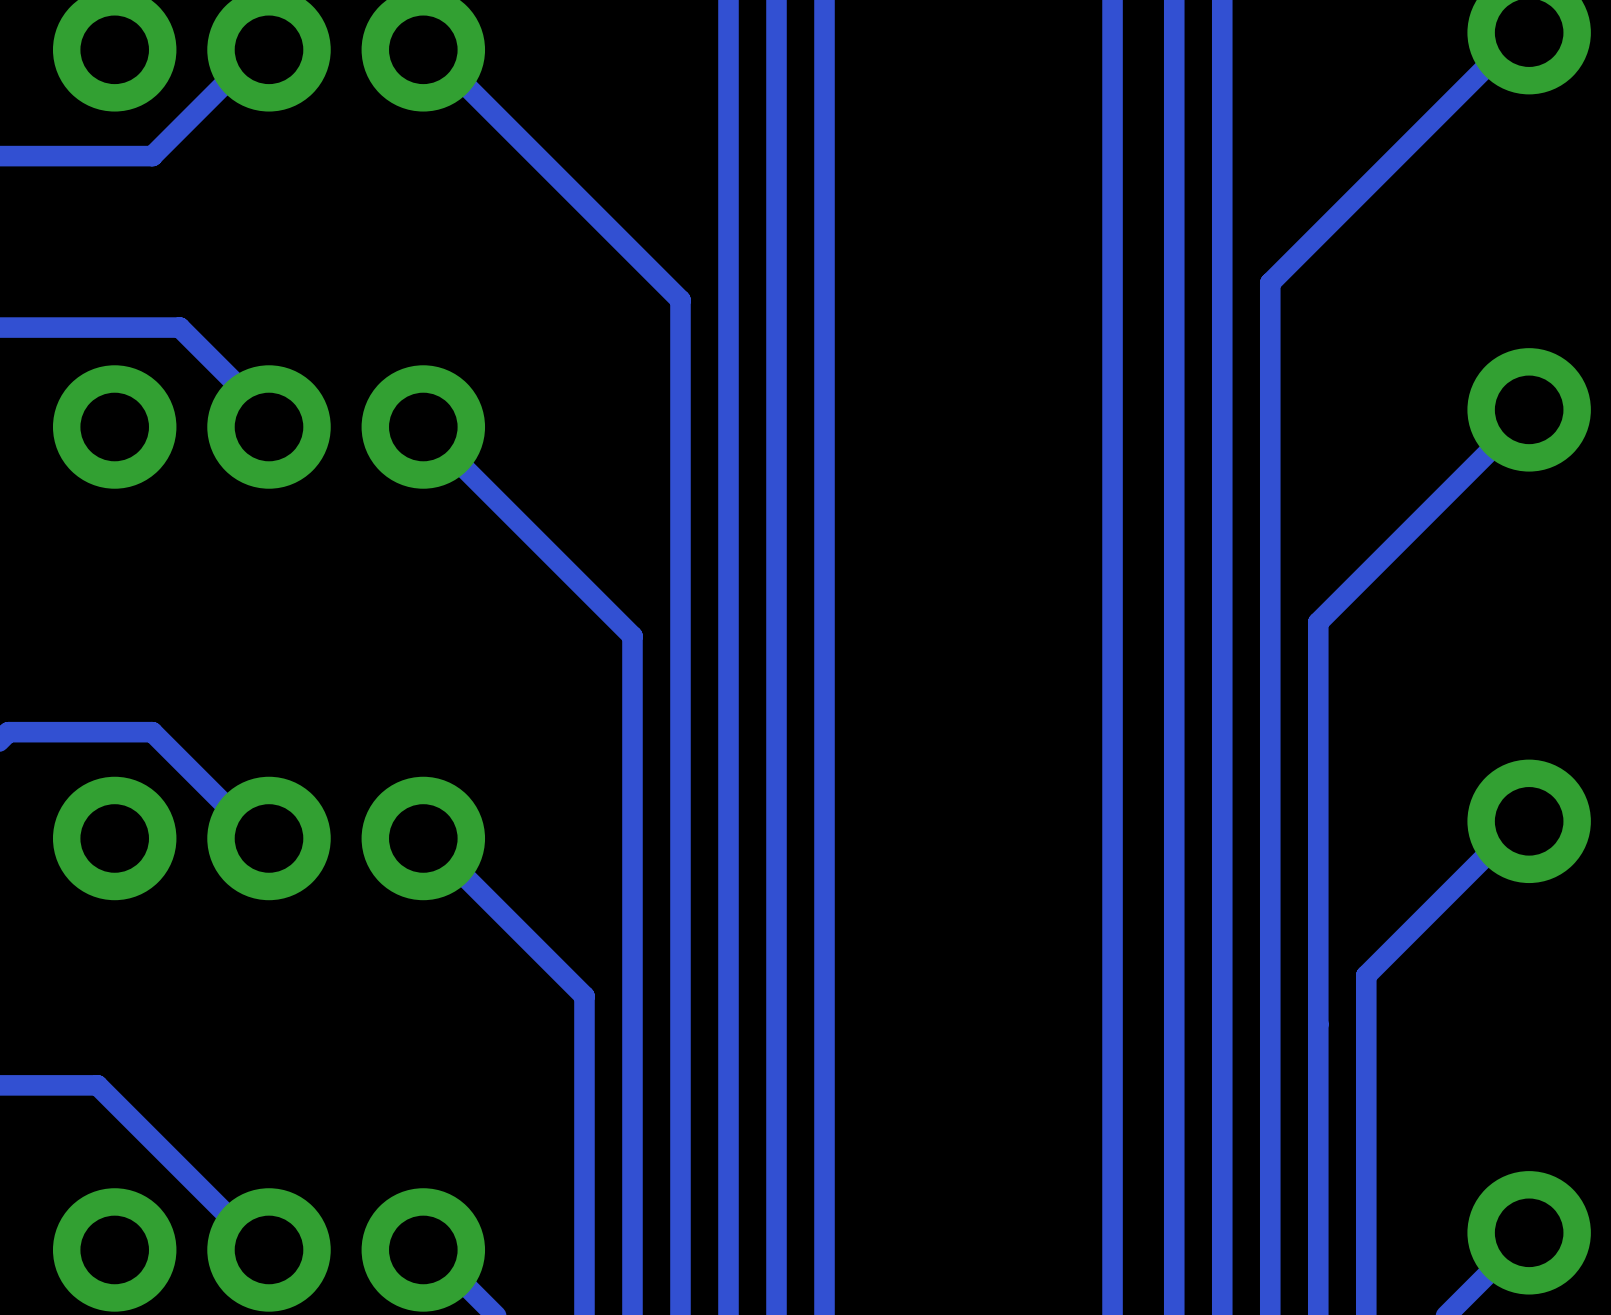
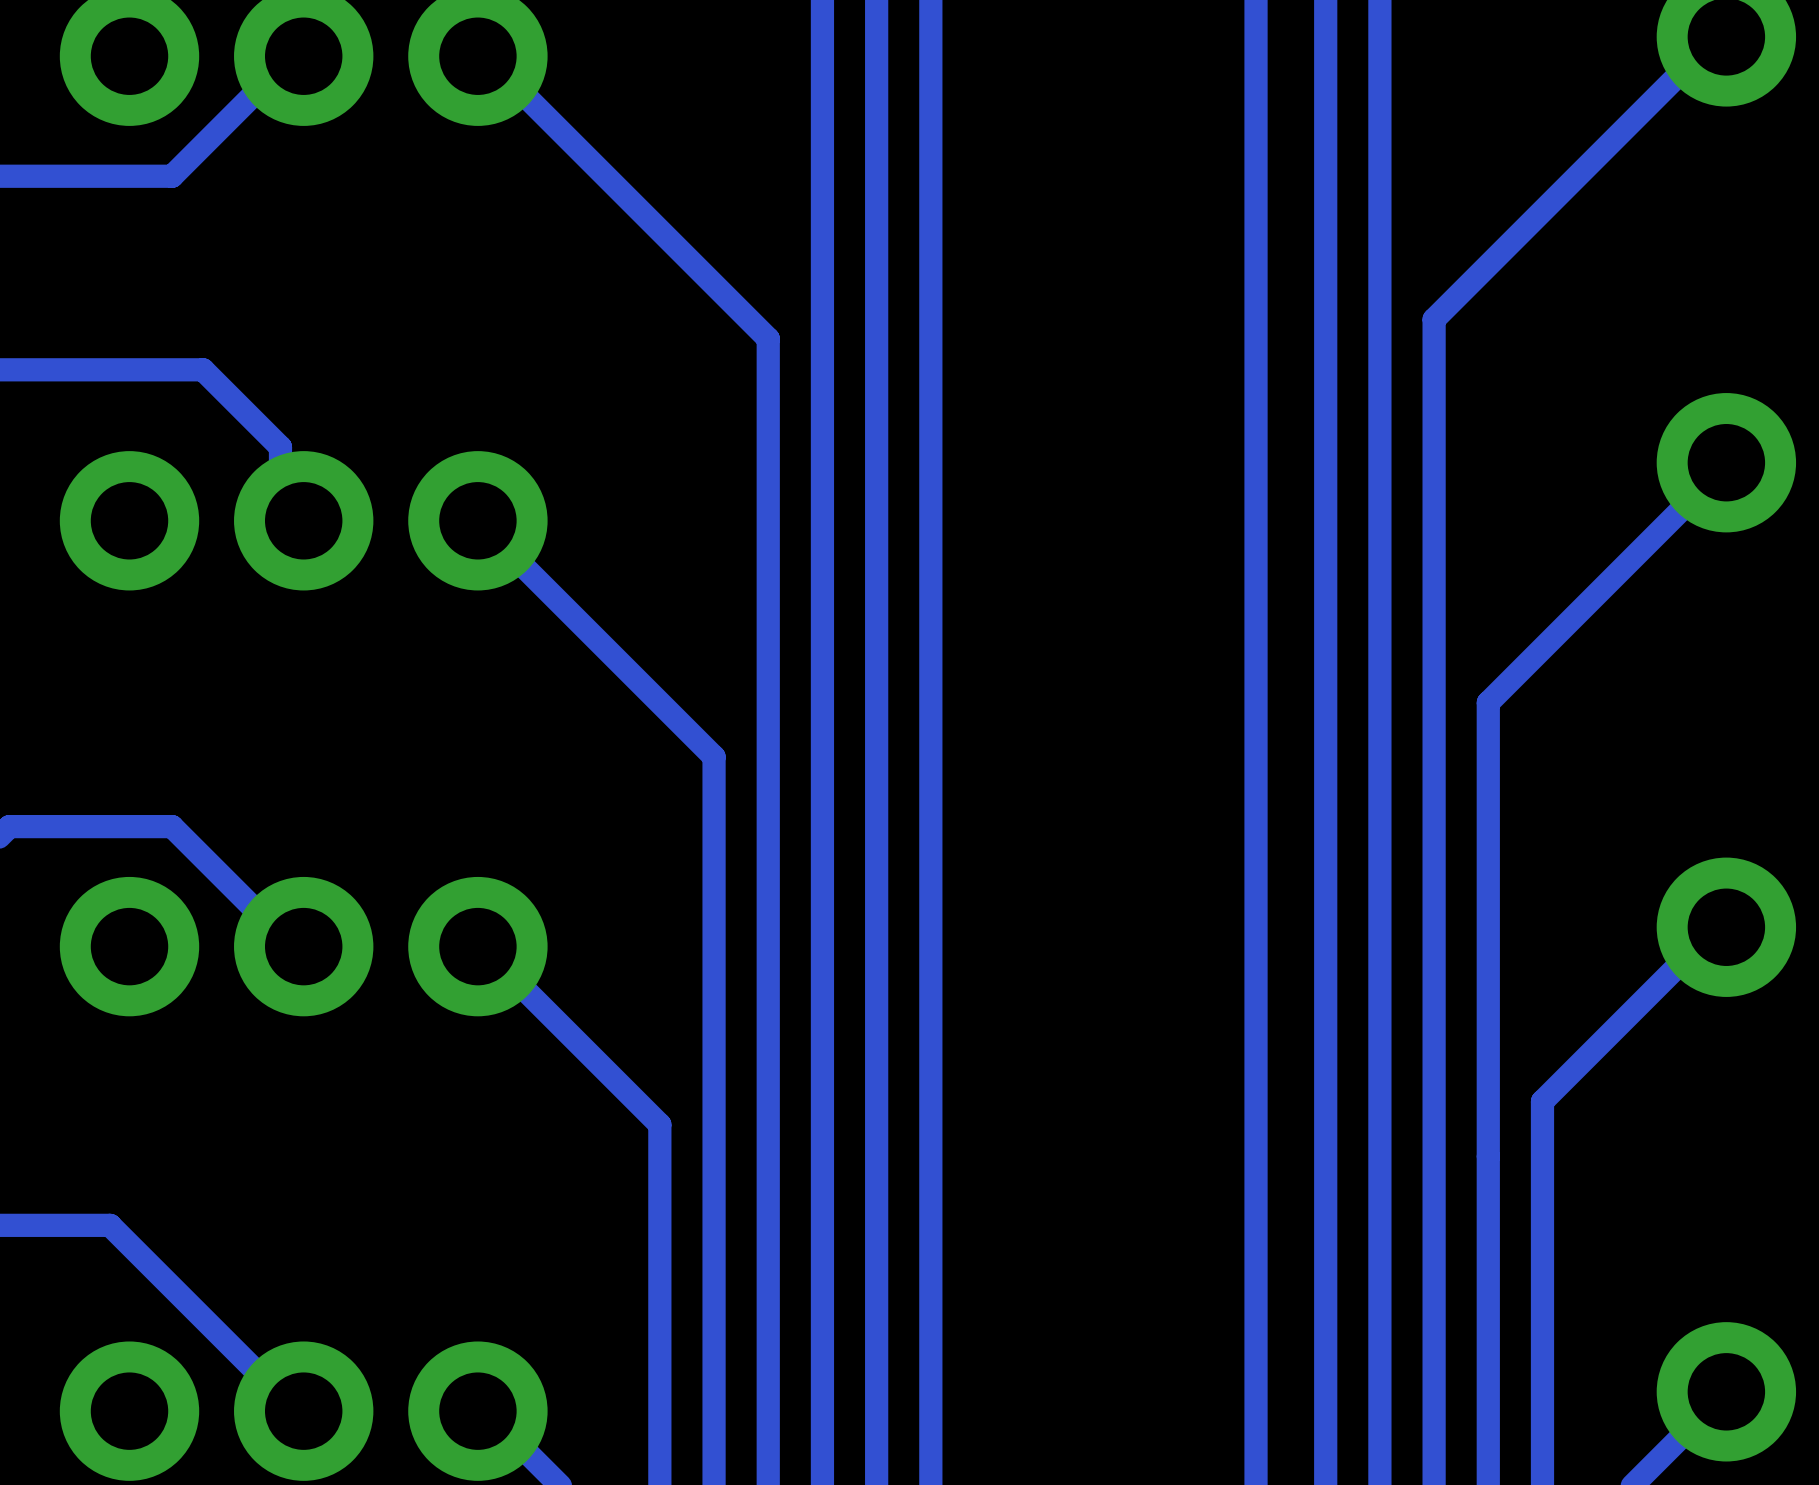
part position: (269, 427) -> (303, 520)
track: (423, 427) (632, 636) (632, 670) -> (477, 520) (714, 756)

